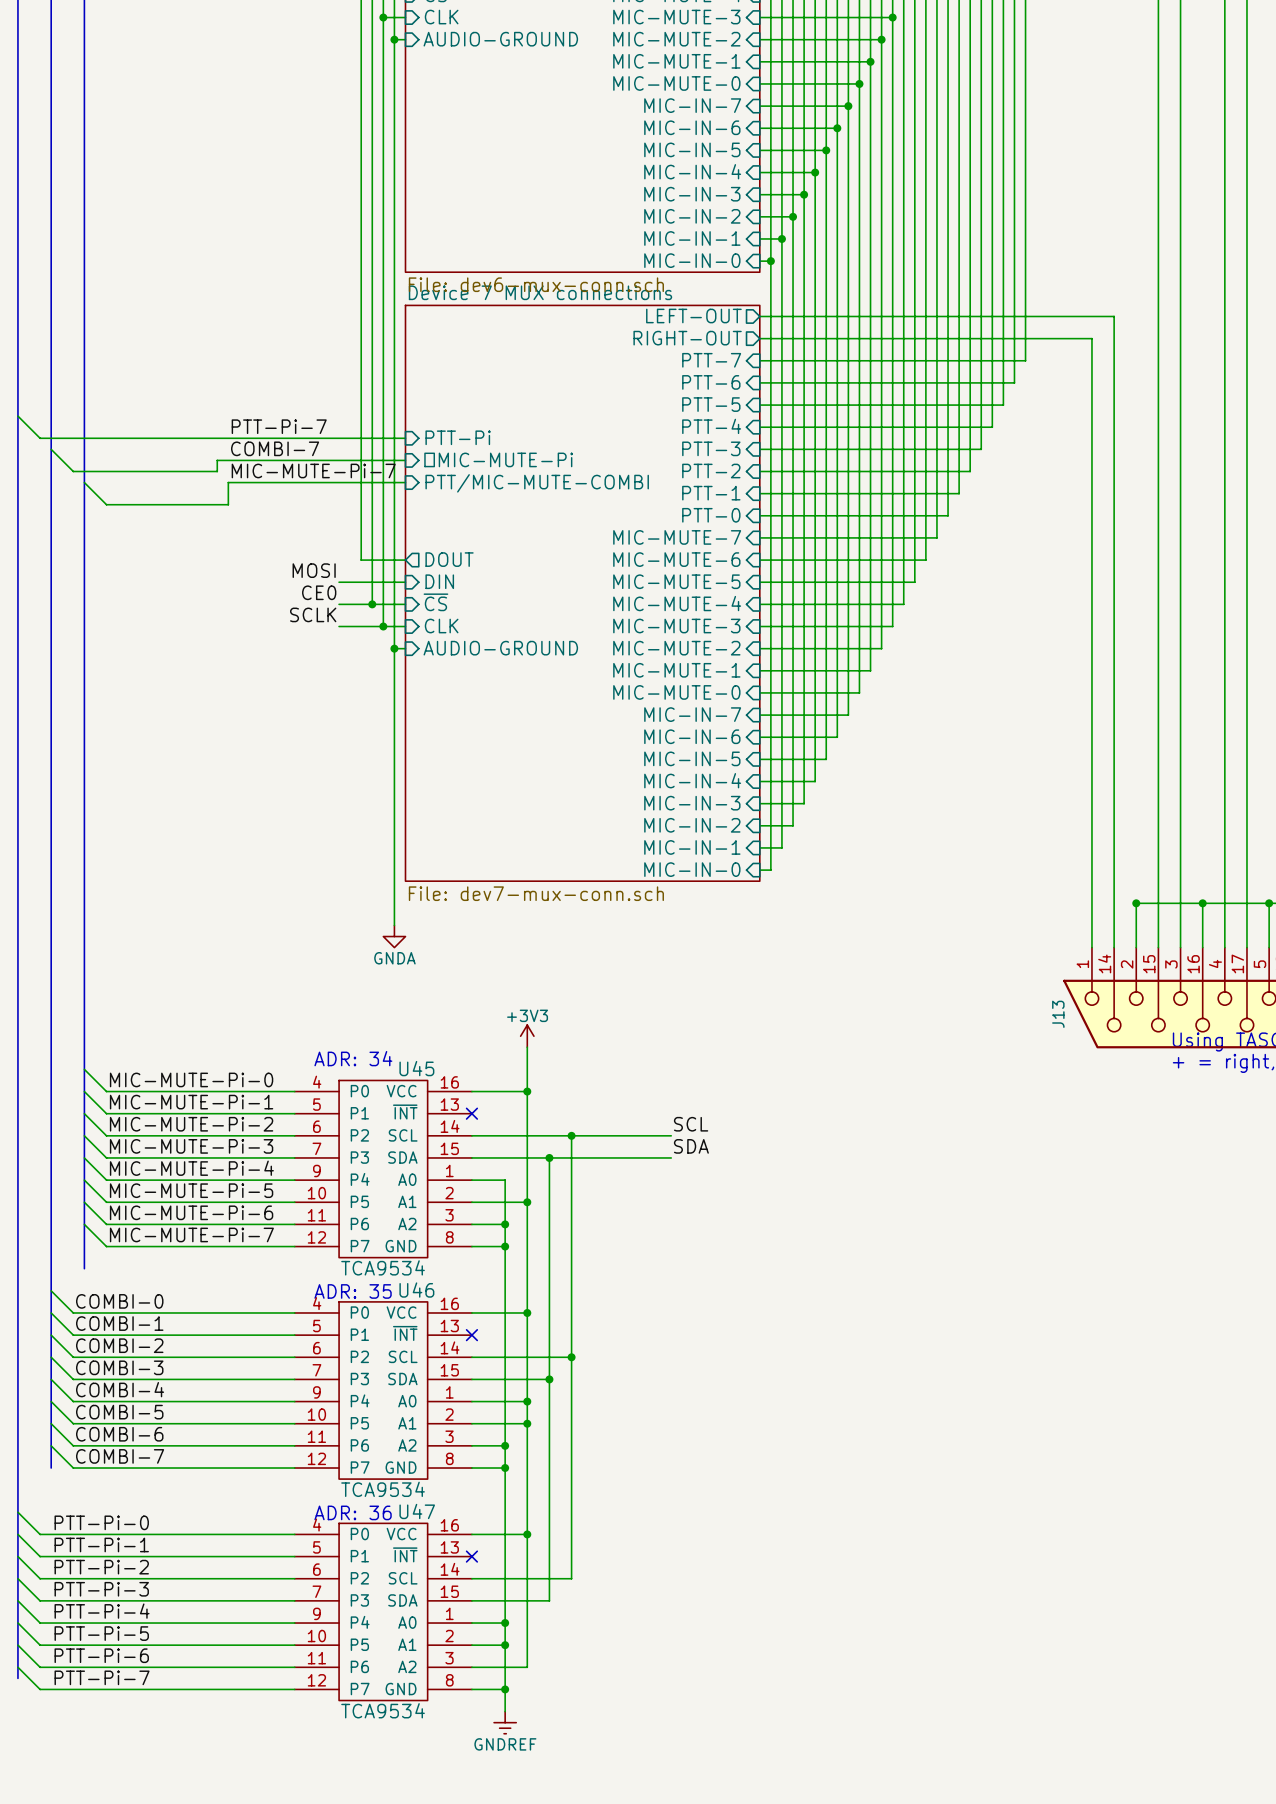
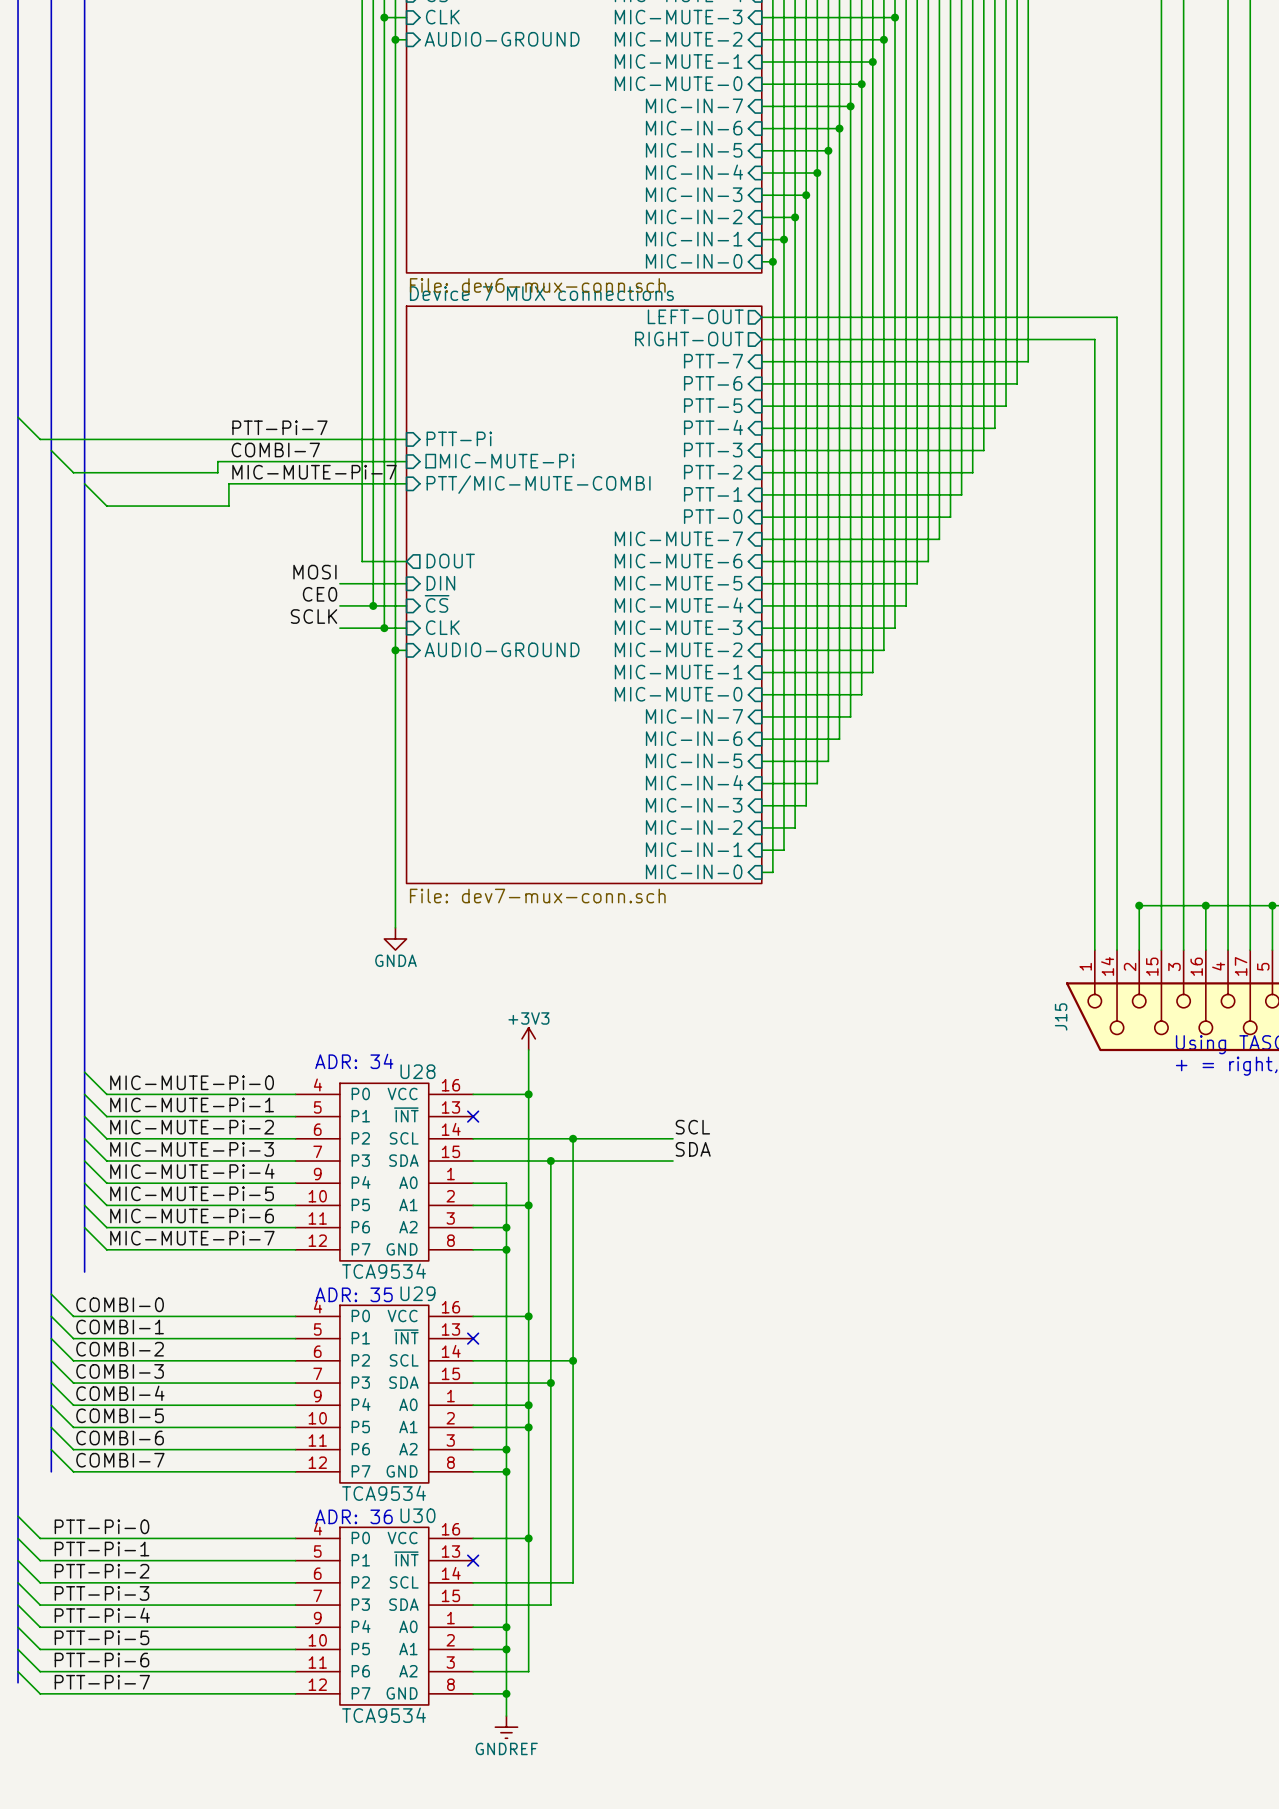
J13 name: J13 (1058, 1014) -> J15 (1061, 1016)
U45 name: U45 (416, 1068) -> U28 (417, 1071)
U46 name: U46 (416, 1290) -> U29 (417, 1293)
U47 name: U47 (417, 1511) -> U30 (417, 1515)

